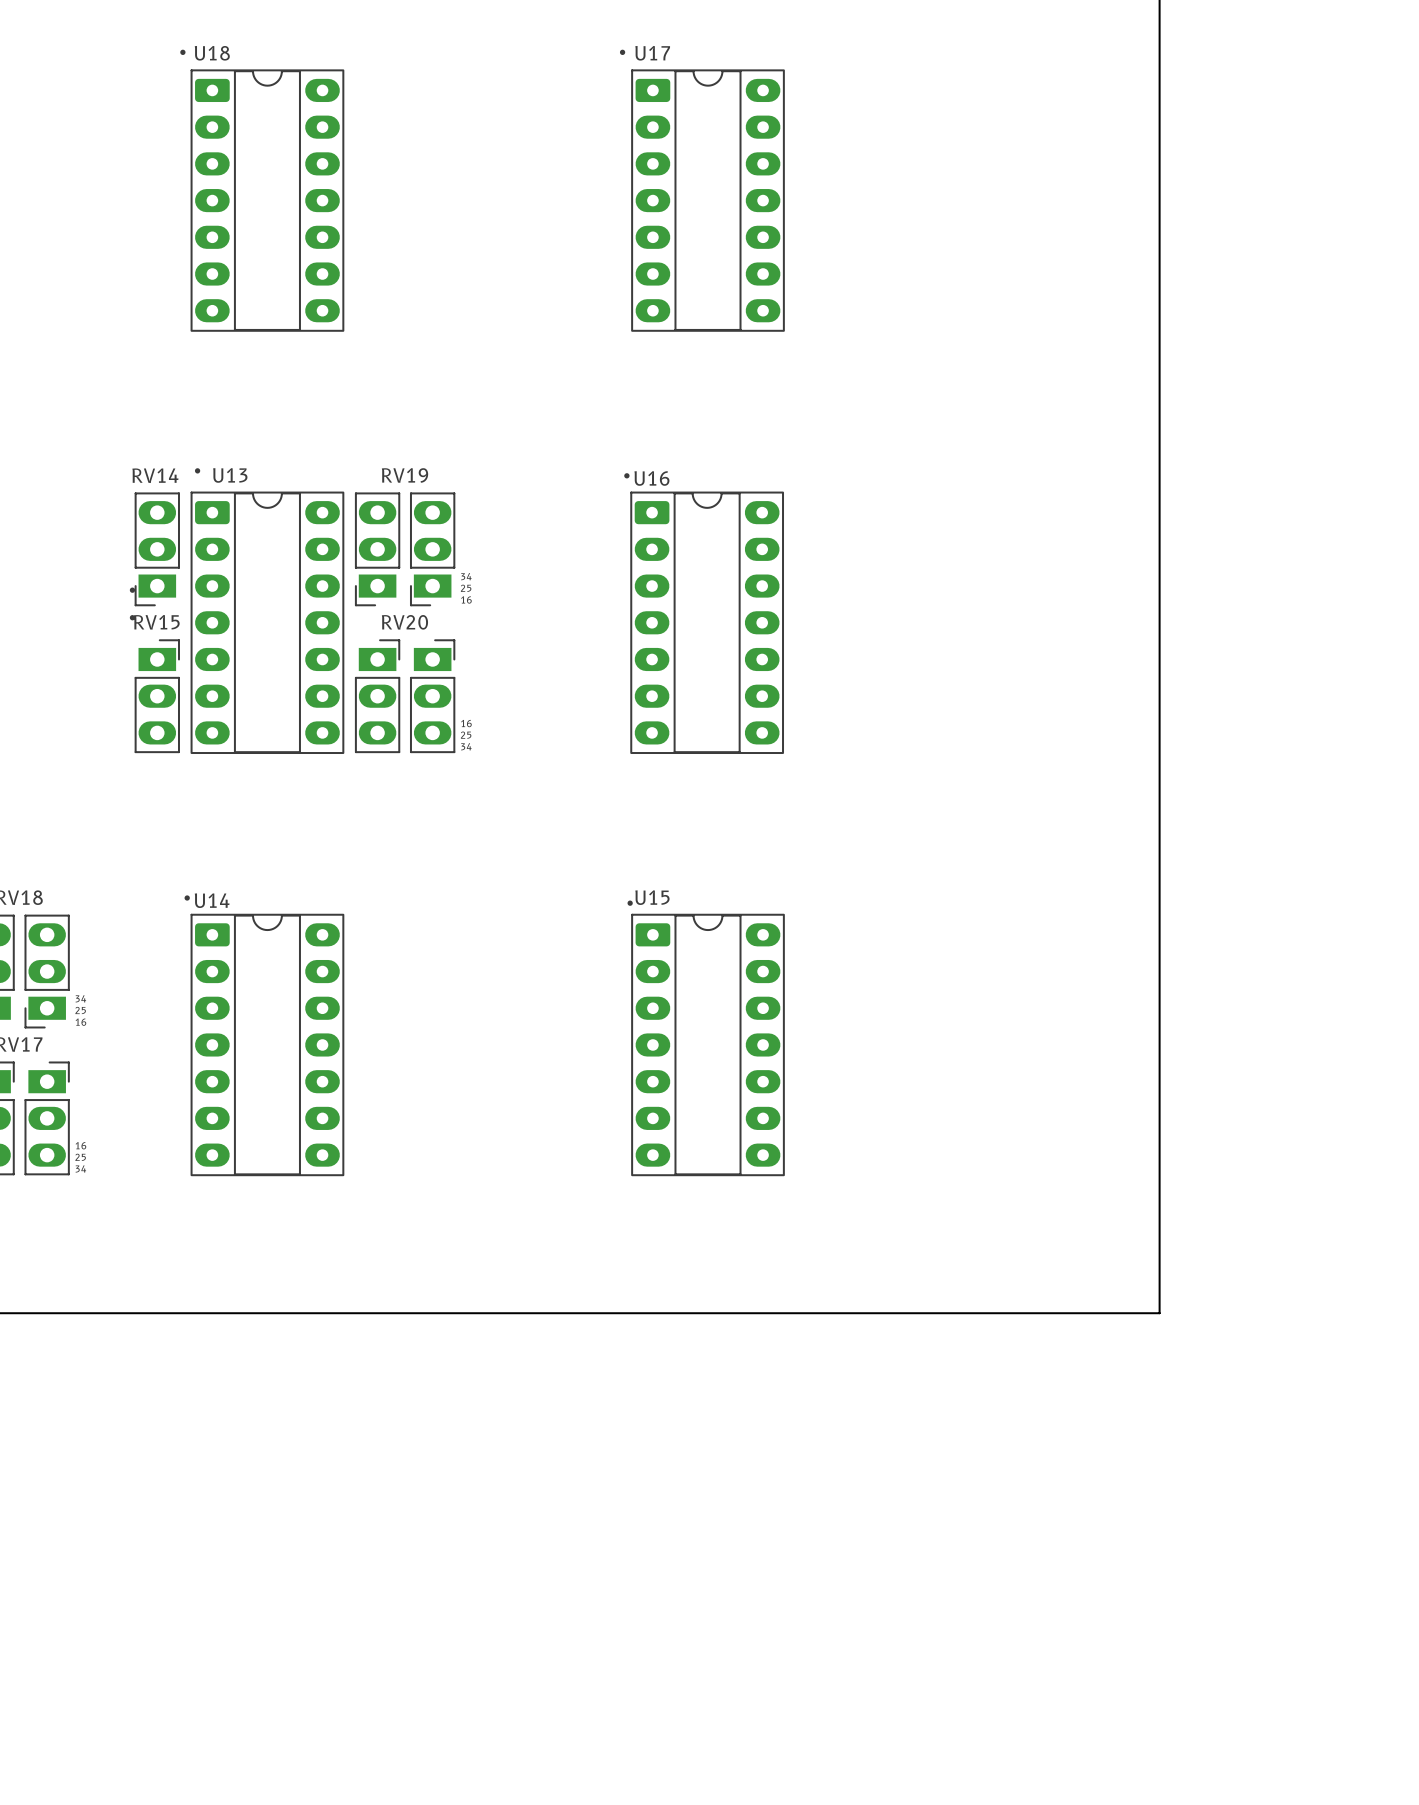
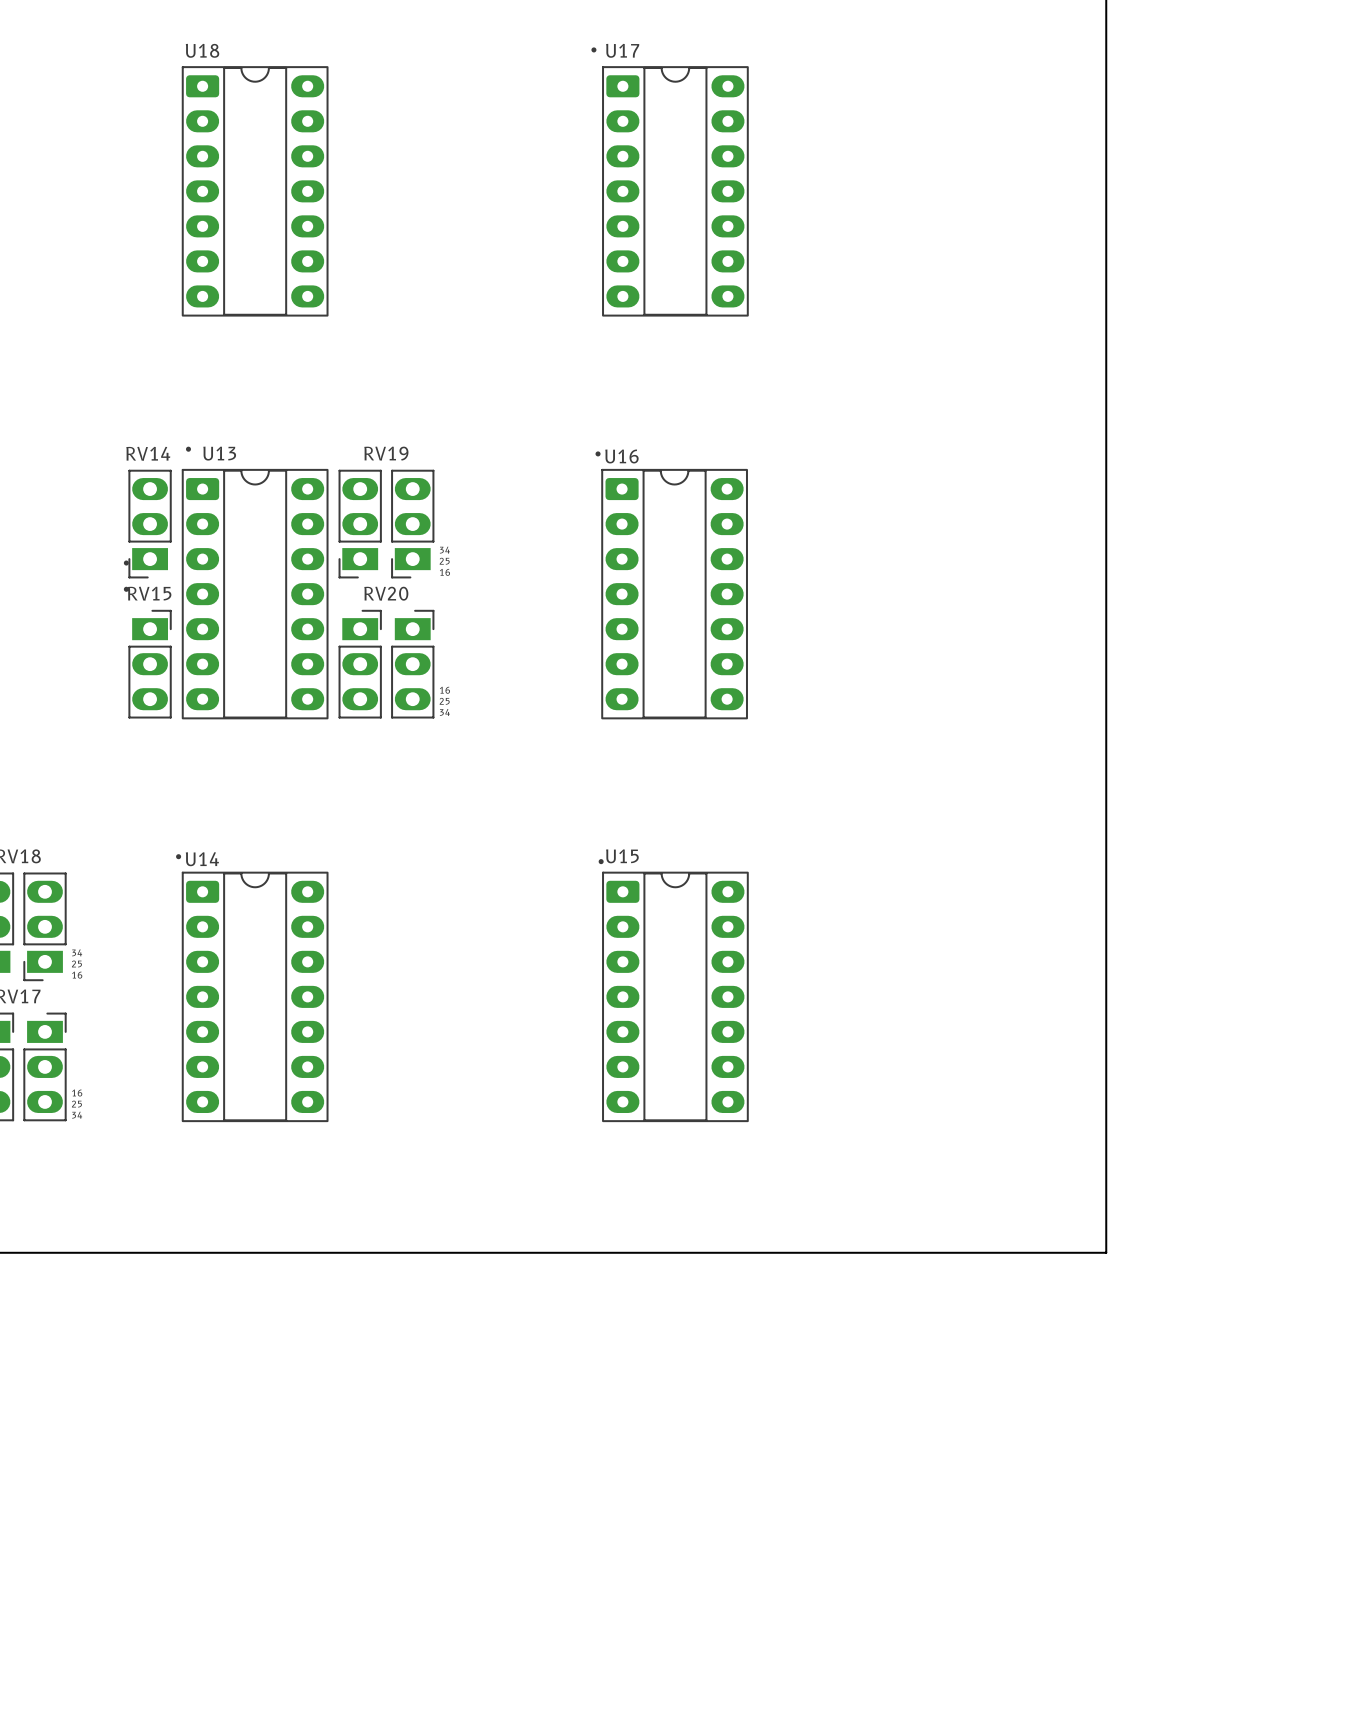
text: . (182, 52) -> none

